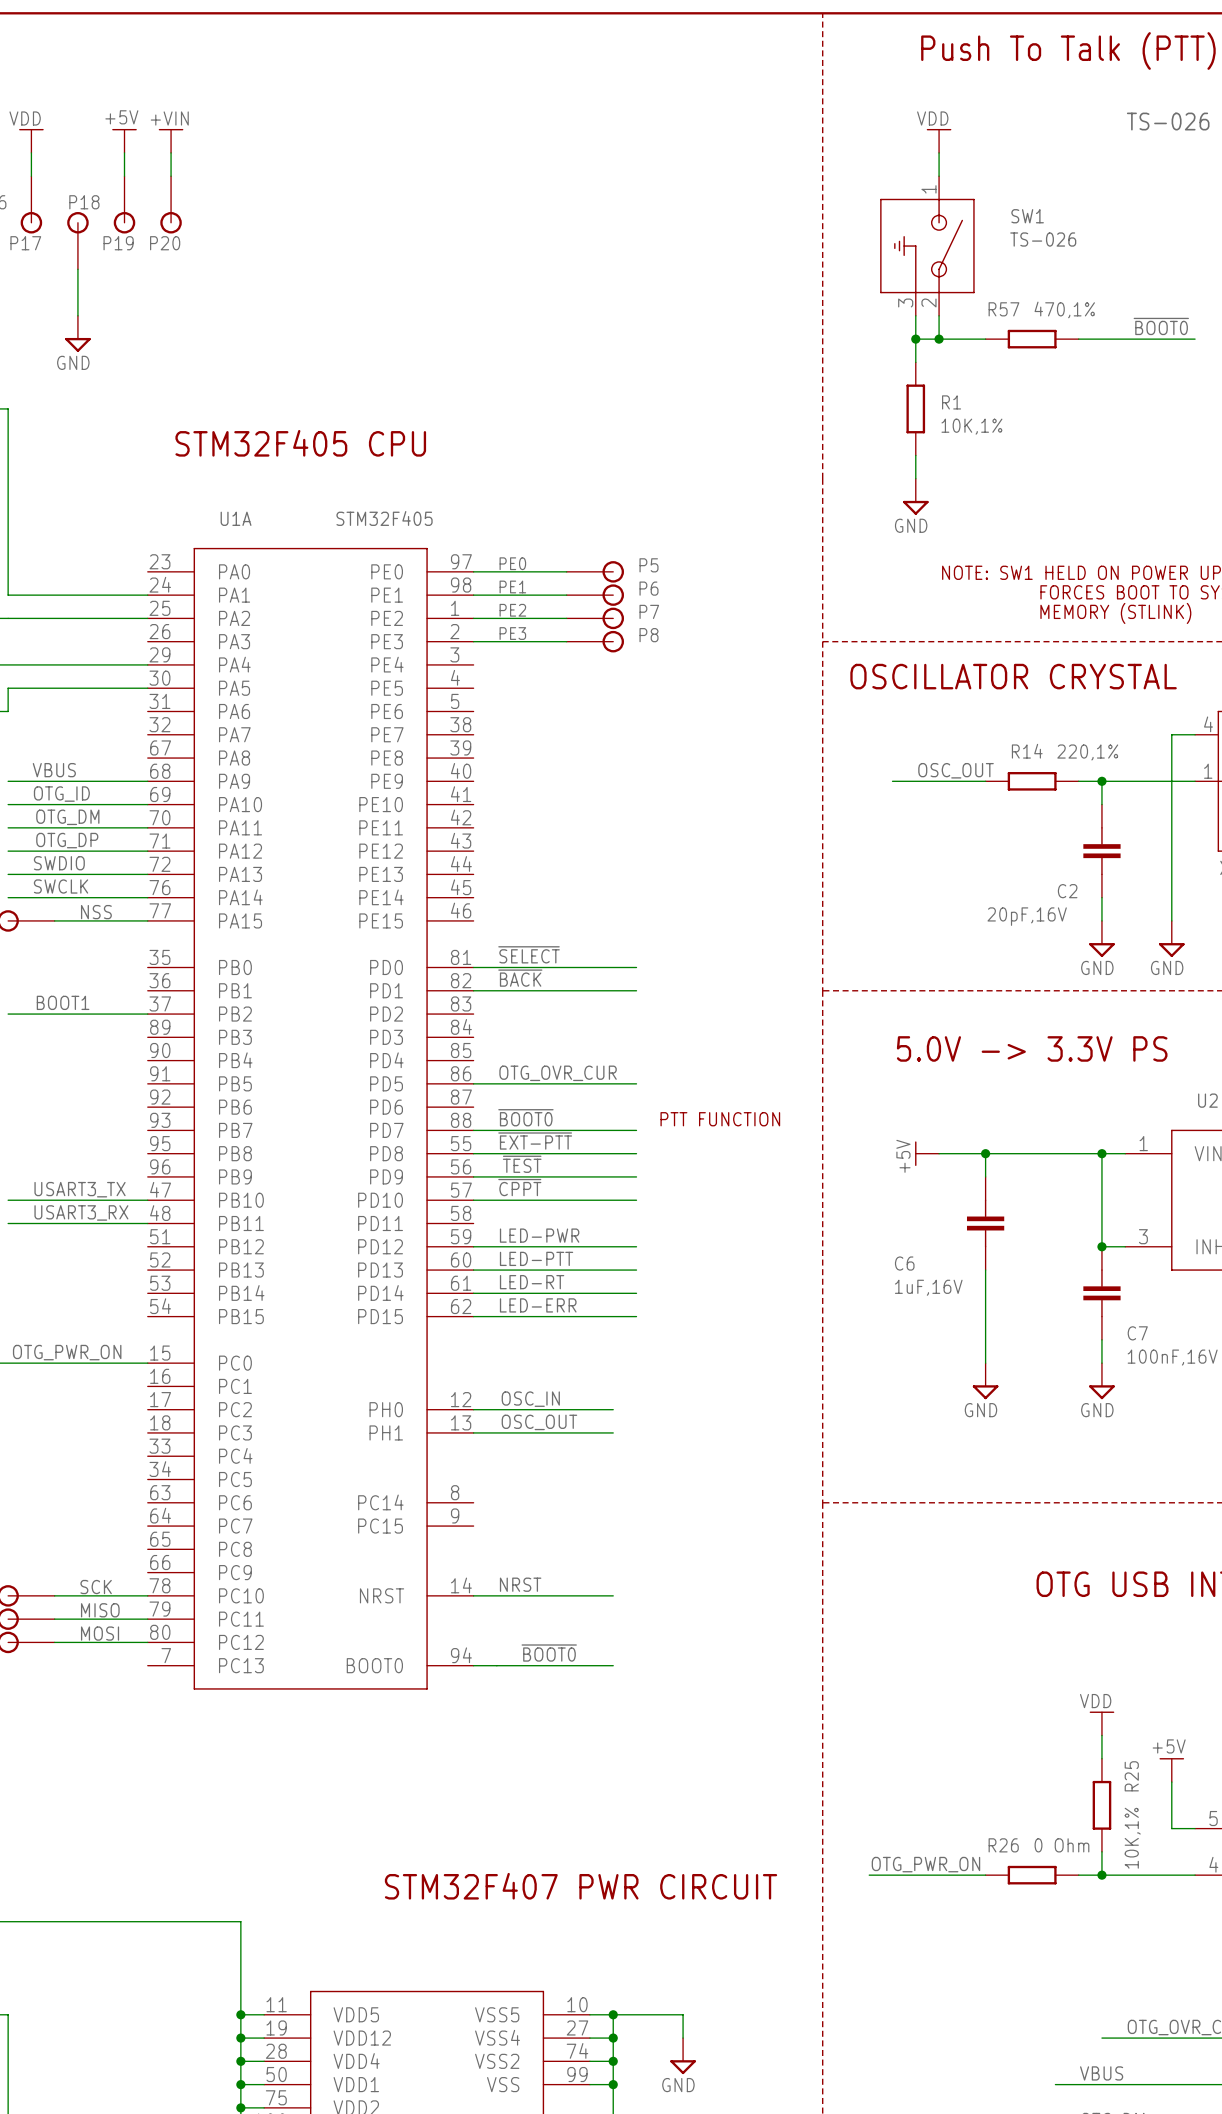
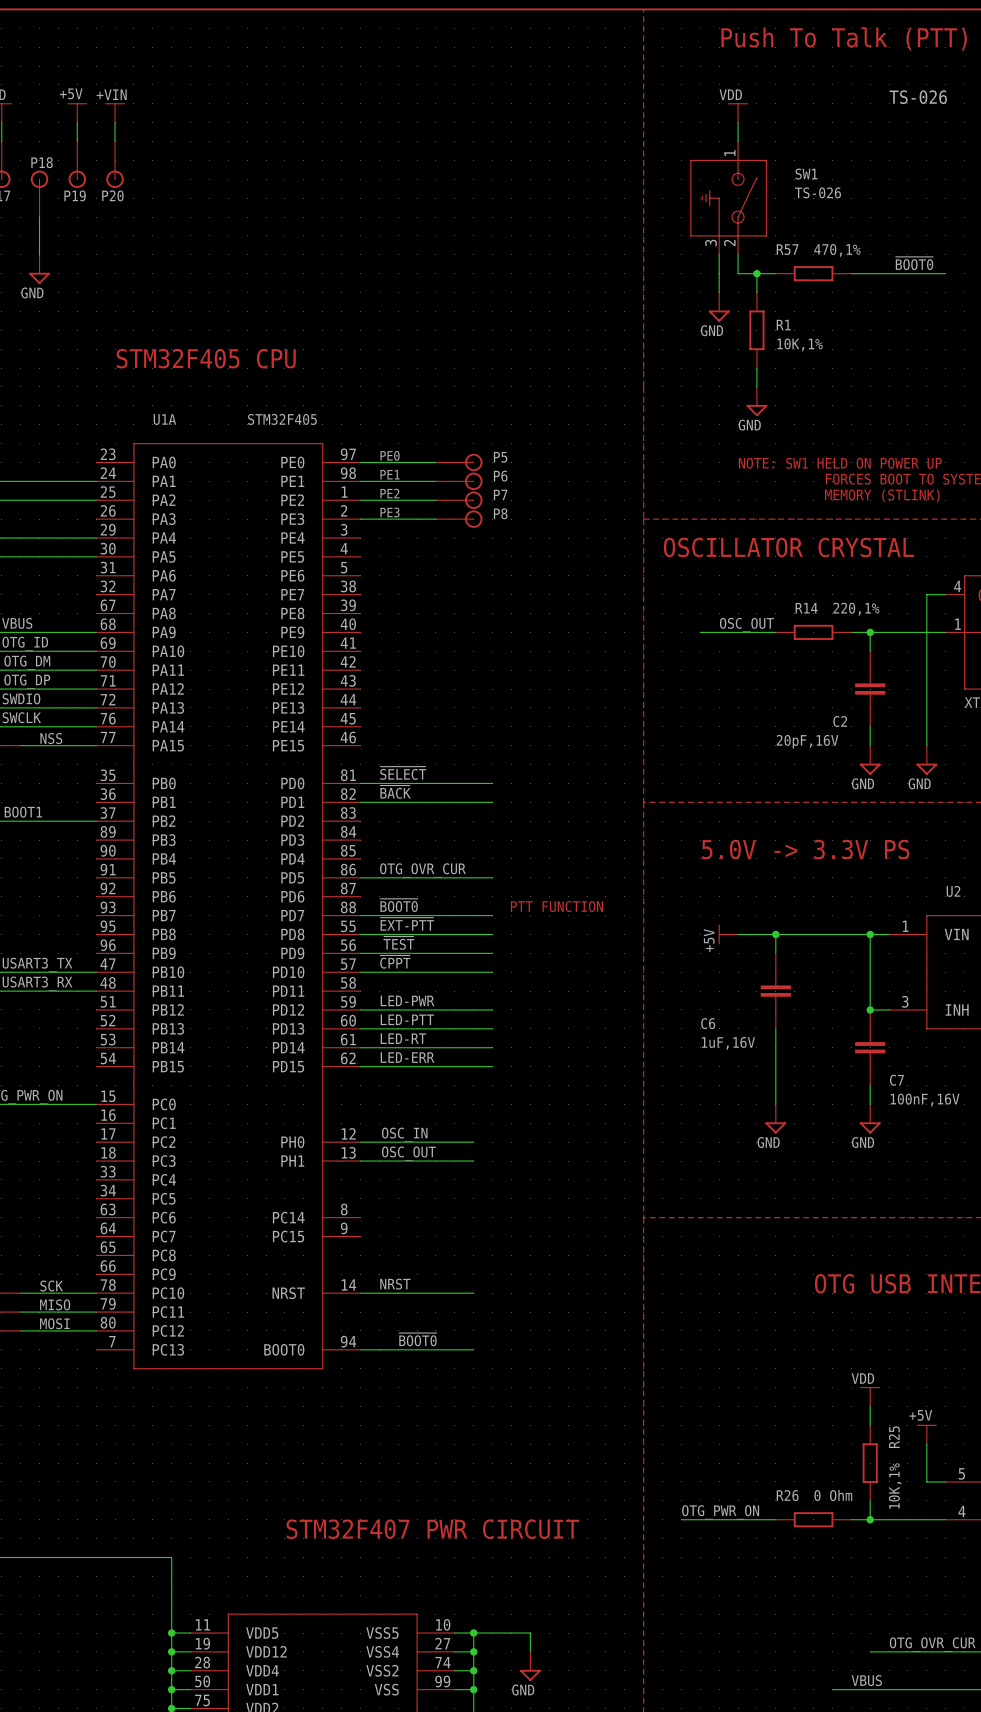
wire: (915, 339) (939, 339) -> none
junction: (915, 339) -> none
junction: (939, 339) -> none
wire: none -> (756, 273) (756, 292)
junction: none -> (756, 273)
power symbol: none -> GND (719, 307)
R1 position: (915, 408) -> (756, 330)
wire: (915, 455) (915, 478) -> (756, 368) (756, 386)
power symbol position: GND (915, 496) -> GND (756, 401)

